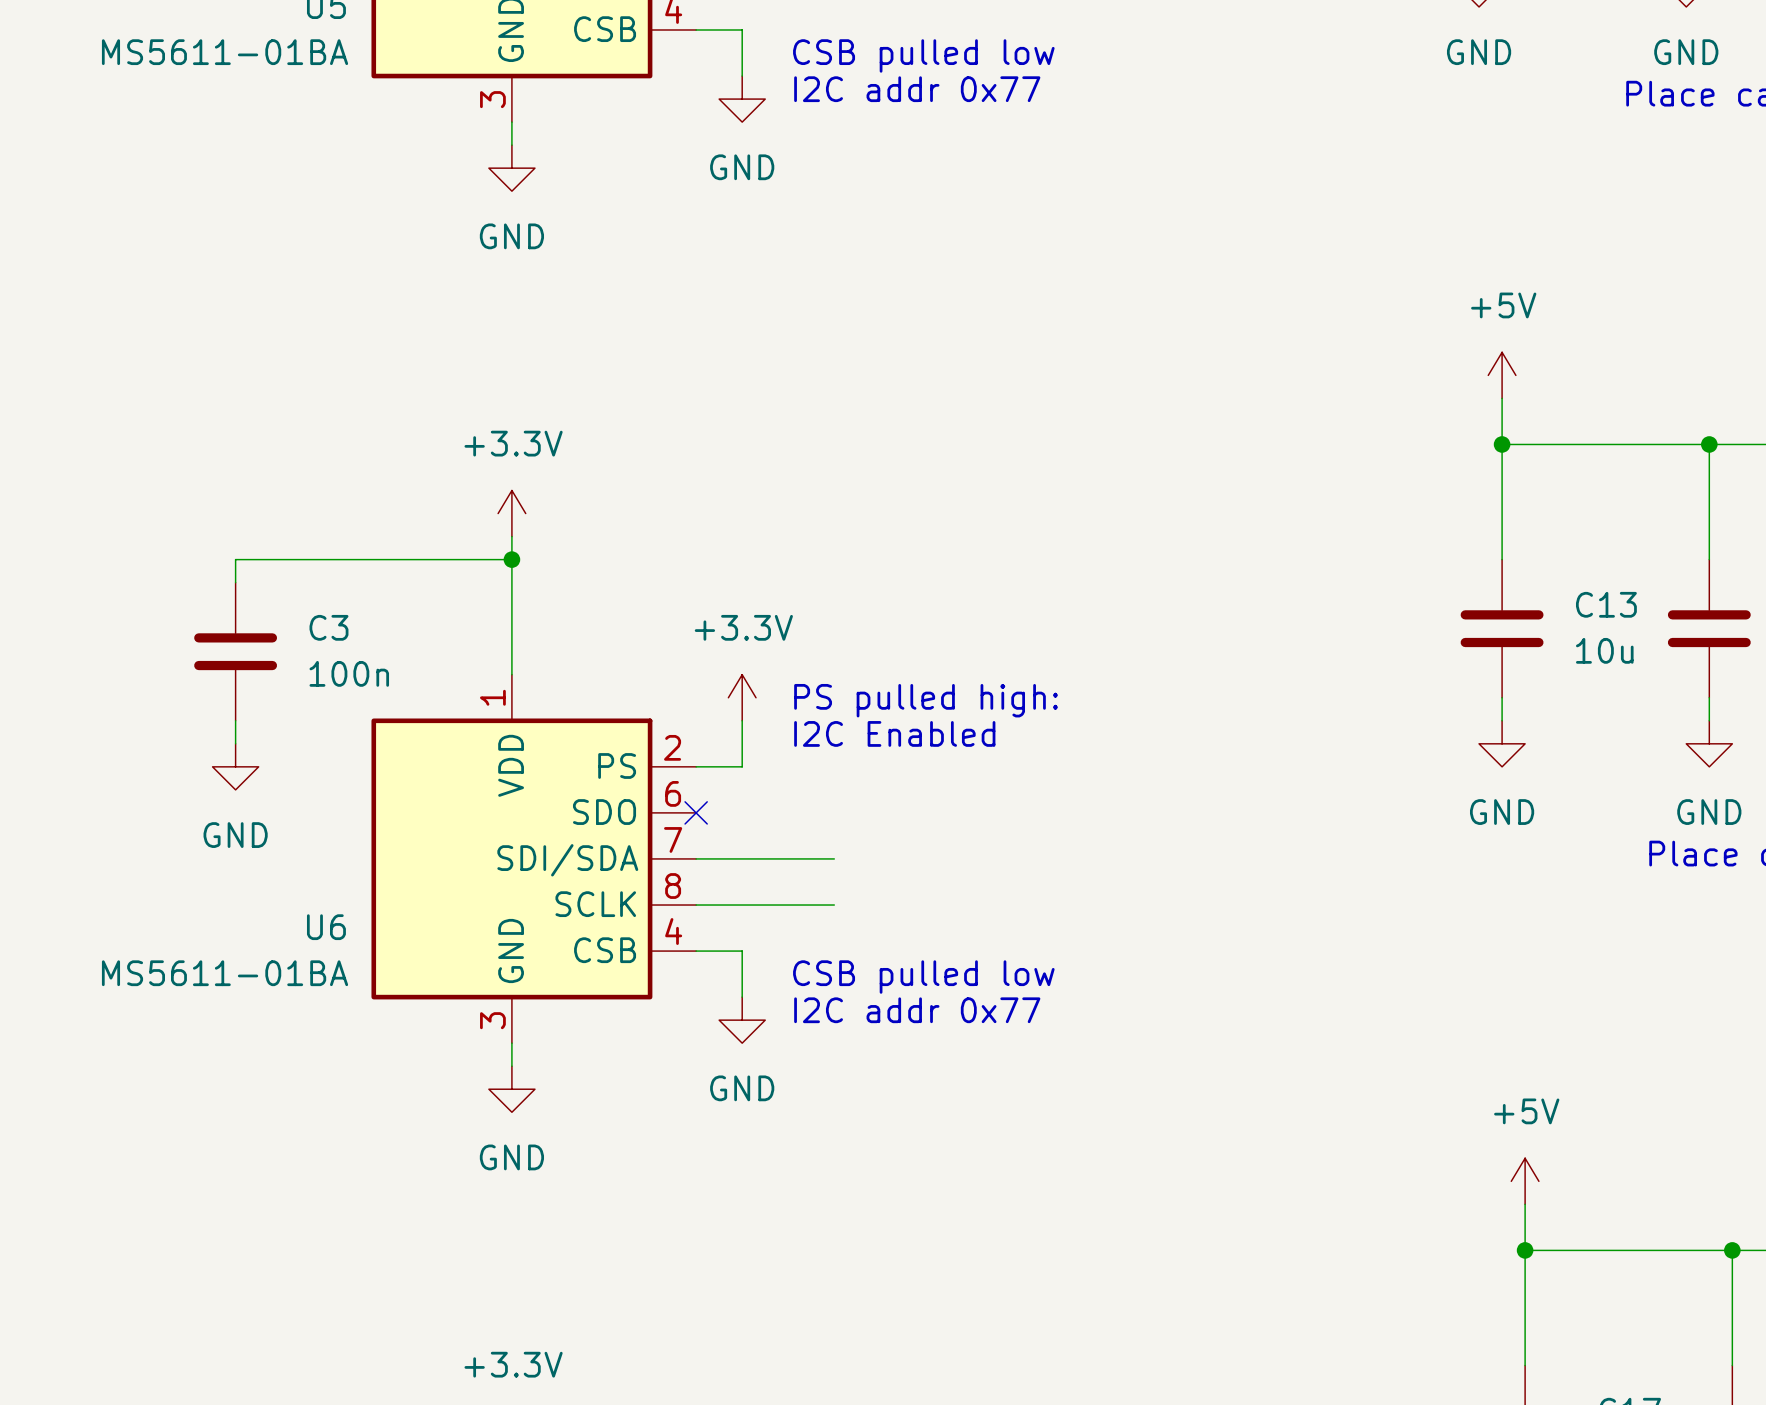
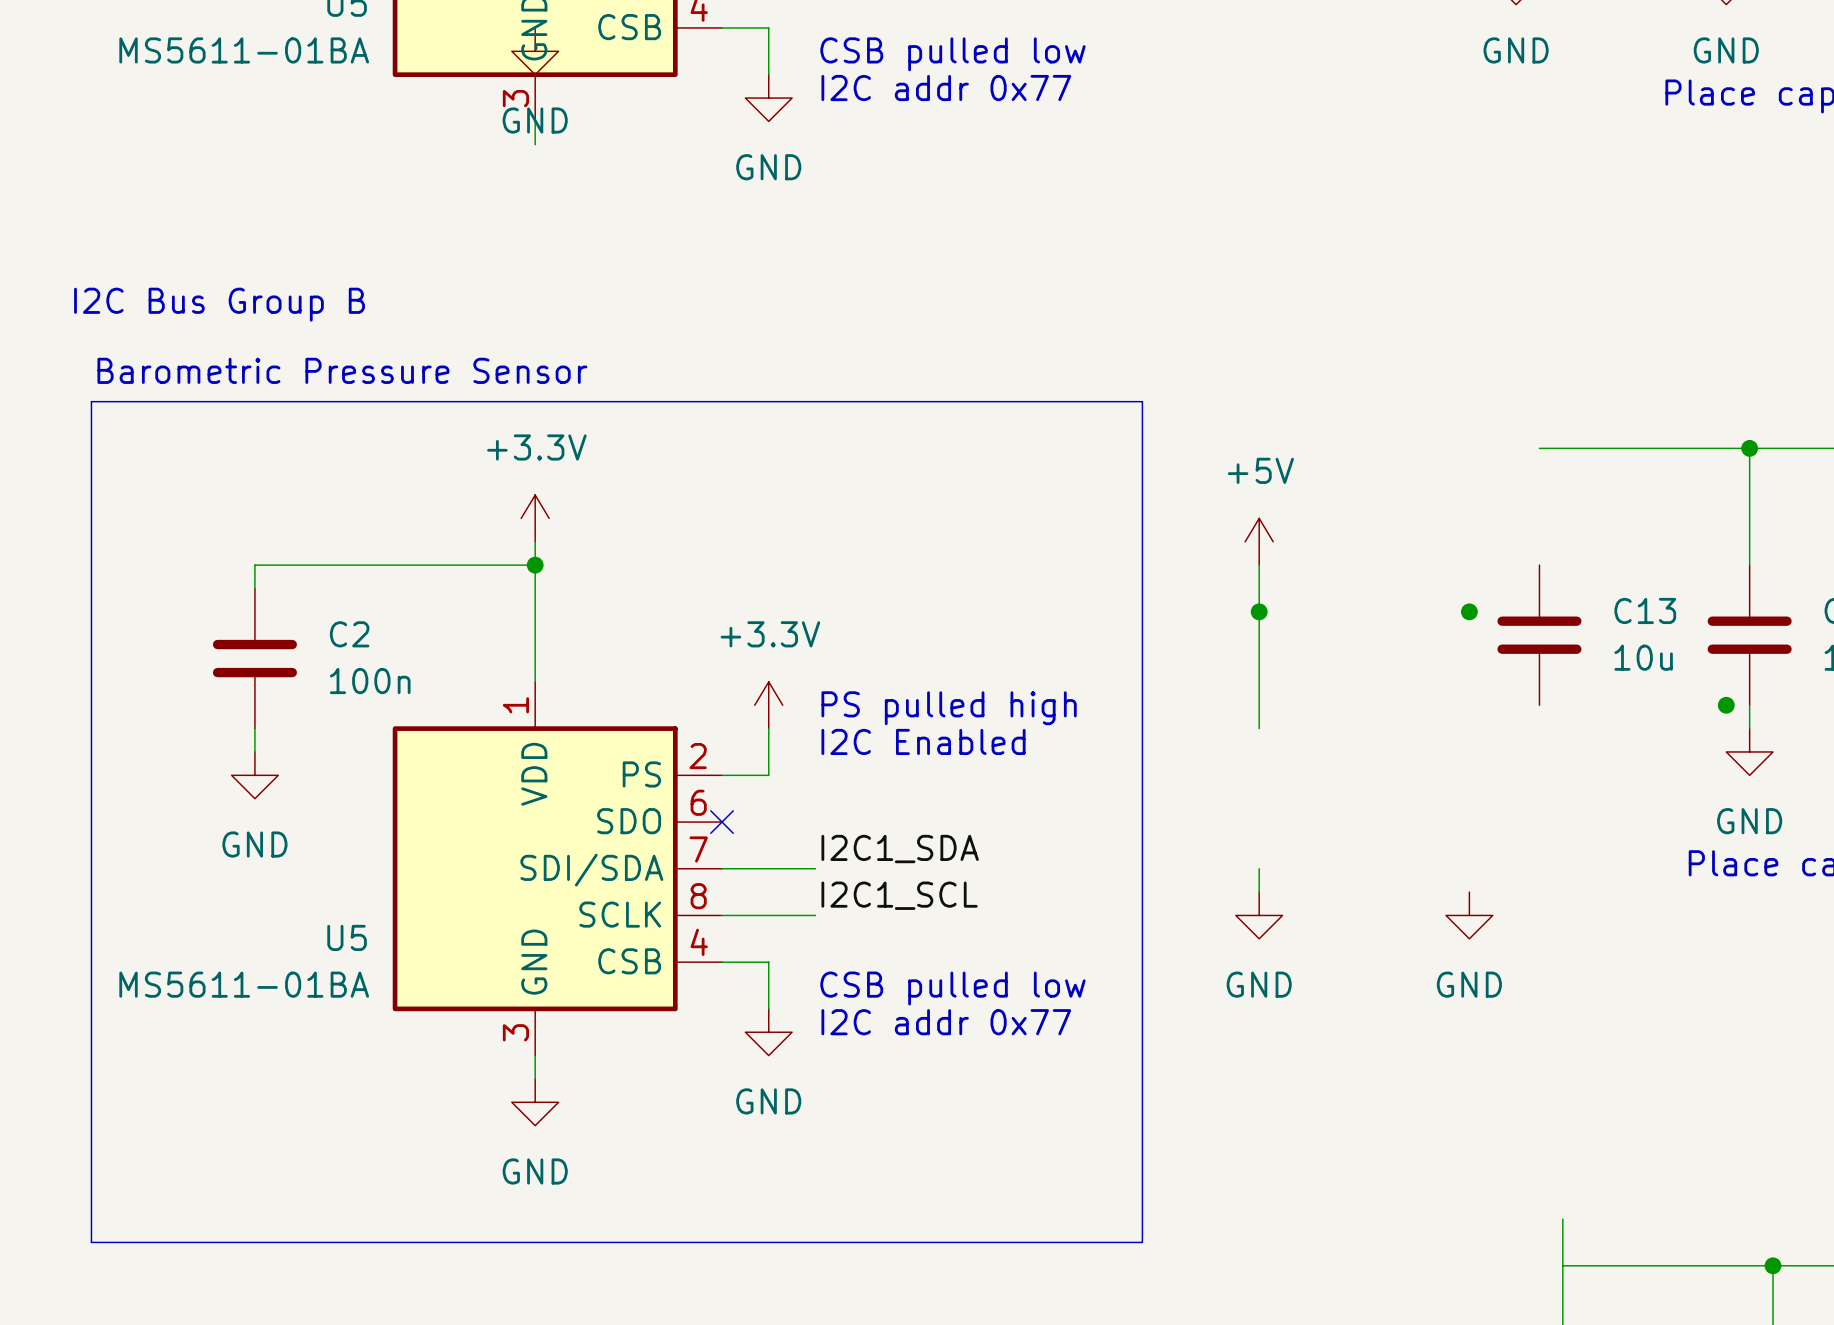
power symbol position: GND (511, 168) -> GND (535, 51)
text: none -> I2C Bus Group B (219, 304)
text: none -> Barometric Pressure Sensor (342, 370)
power symbol position: +5V (1502, 375) -> +5V (1259, 541)
line: none -> (91, 401) (91, 1242) (1142, 1242) (1142, 401) (91, 401)
wire: (1502, 398) (1502, 559) -> (1259, 565) (1259, 728)
junction: (1502, 444) -> none
junction: none -> (1259, 611)
junction: none -> (1469, 611)
C3 name: C3 (328, 627) -> C2 (349, 634)
wire: (1502, 697) (1502, 720) -> (1259, 868) (1259, 892)
junction: none -> (1726, 705)
text: PS pulled high: (926, 700) -> PS pulled high (949, 708)
power symbol: GND (1502, 743) -> none
label: none -> I2C1_SDA (900, 849)
wire: (788, 858) (834, 858) -> none
label: none -> I2C1_SCL (899, 895)
wire: (788, 905) (834, 905) -> none
power symbol: none -> GND (1259, 915)
power symbol: none -> GND (1469, 915)
U6 name: U6 (326, 927) -> U5 (347, 937)
power symbol: +5V (1525, 1181) -> none
junction: (1525, 1250) -> none

